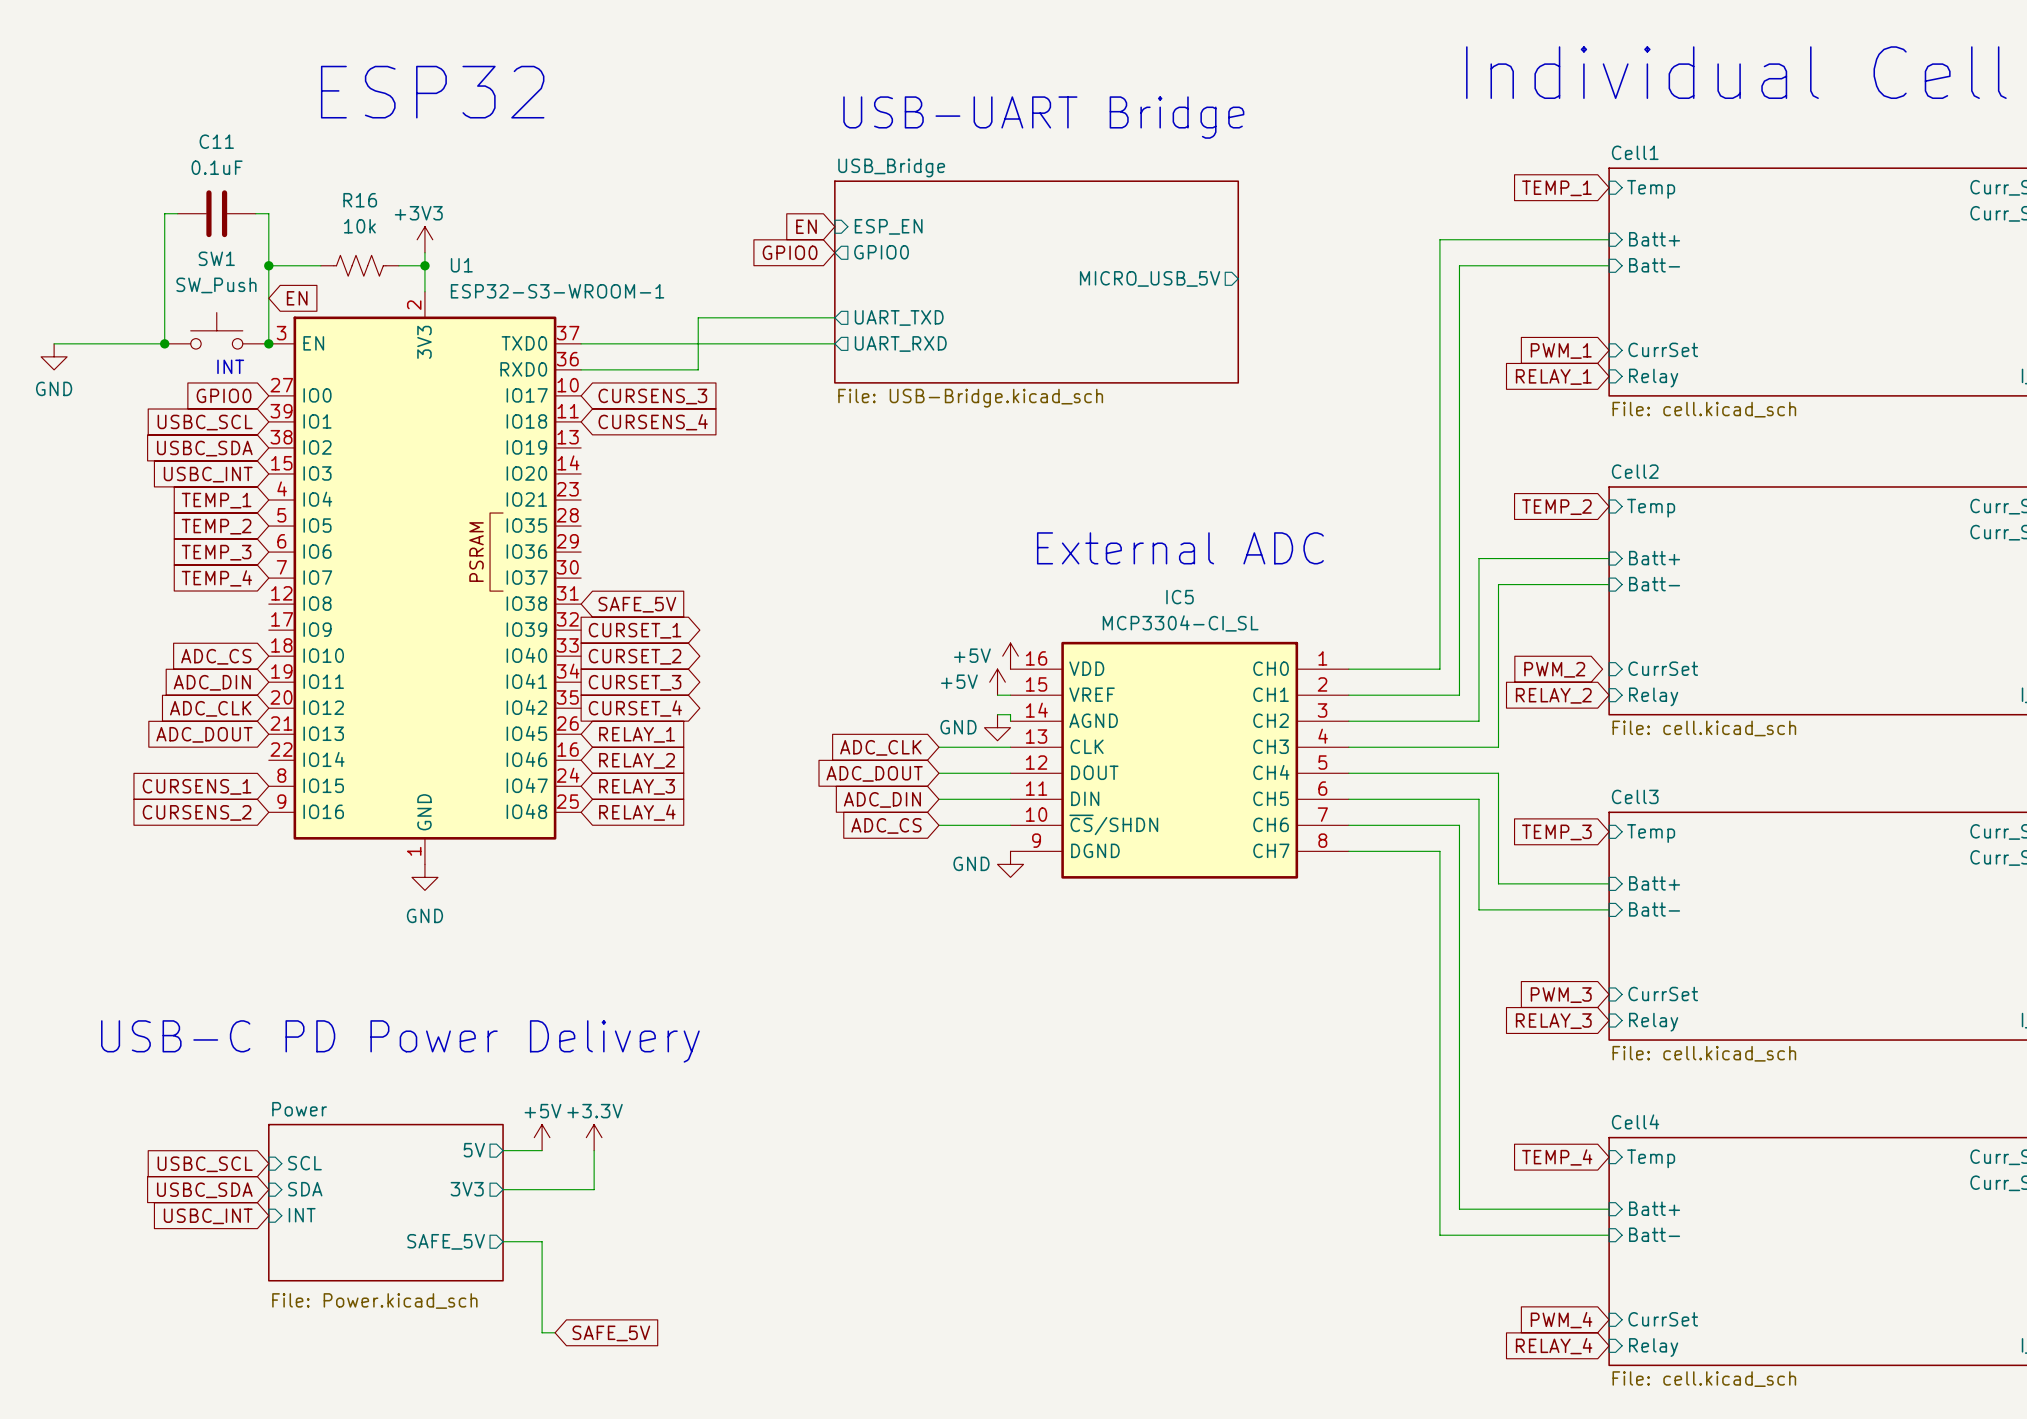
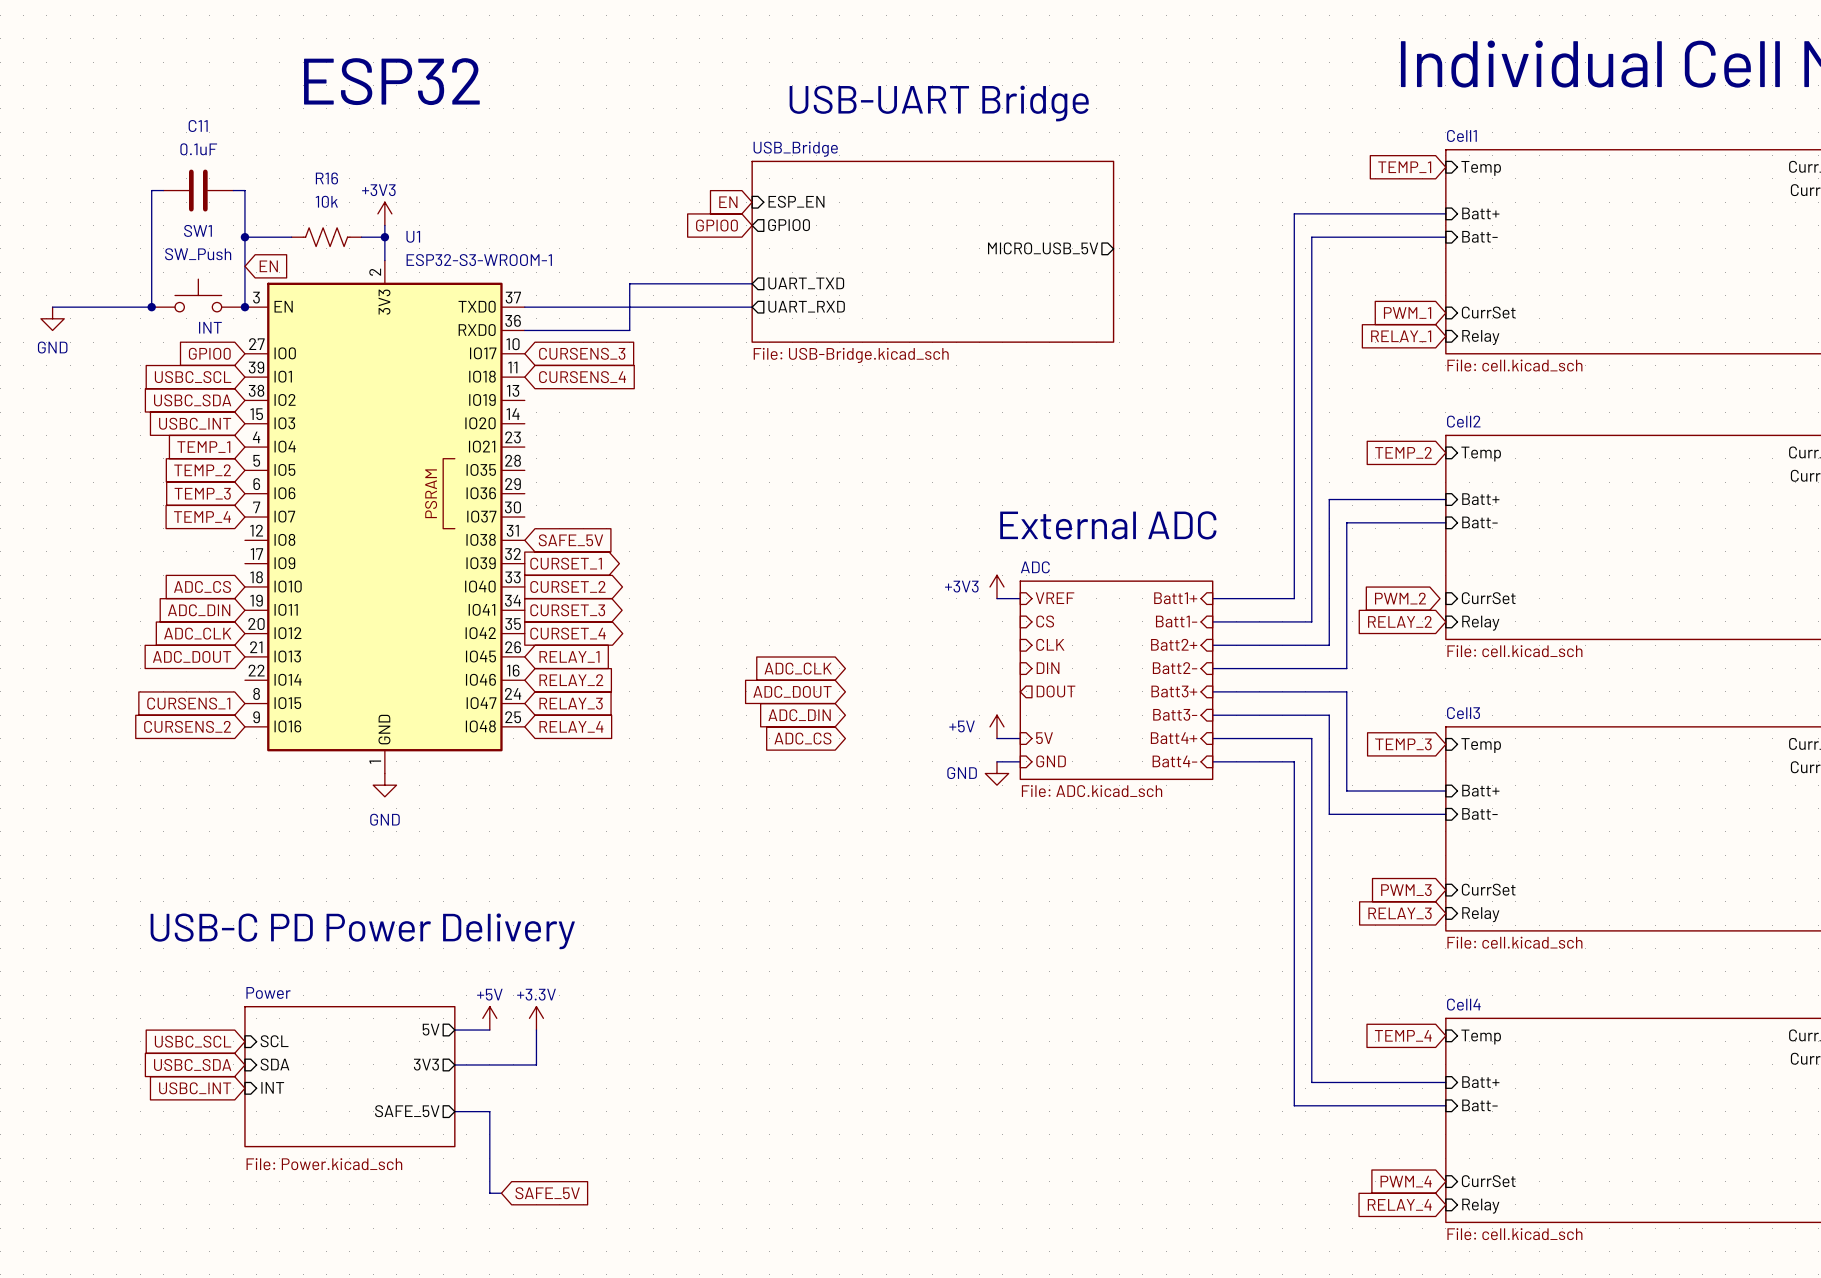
text position: External ADC (1180, 548) -> External ADC (1108, 525)
power symbol: +5V (1010, 656) -> none
power symbol: none -> +3V3 (996, 586)
hierarchical label: none -> VREF (1054, 598)
hierarchical label: none -> Batt1+ (1175, 598)
power symbol: +5V (997, 682) -> none
hierarchical label: none -> CS (1045, 621)
hierarchical label: none -> Batt1- (1176, 621)
wire: (997, 695) (1010, 695) -> none
wire: (997, 714) (1010, 714) (1010, 721) -> none
hierarchical label: none -> CLK (1050, 644)
hierarchical label: none -> Batt2+ (1174, 644)
power symbol: GND (997, 727) -> none
hierarchical label: none -> DIN (1048, 668)
hierarchical label: none -> Batt2- (1175, 668)
wire: (938, 747) (1010, 747) -> none
IC5: MCP3304-CI_SL (1179, 760) -> none
sheet ADC: none -> File: ADC.kicad_sch (1116, 680)
hierarchical label: none -> DOUT (1056, 691)
hierarchical label: none -> Batt3+ (1174, 691)
wire: (938, 773) (1010, 773) -> none
hierarchical label: none -> Batt3- (1175, 714)
wire: (938, 799) (1010, 799) -> none
power symbol: none -> +5V (996, 726)
hierarchical label: none -> 5V (1044, 738)
hierarchical label: none -> Batt4+ (1174, 738)
wire: (938, 825) (1010, 825) -> none
hierarchical label: none -> GND (1051, 761)
hierarchical label: none -> Batt4- (1174, 761)
power symbol: GND (1010, 864) -> none
power symbol: none -> GND (996, 773)

